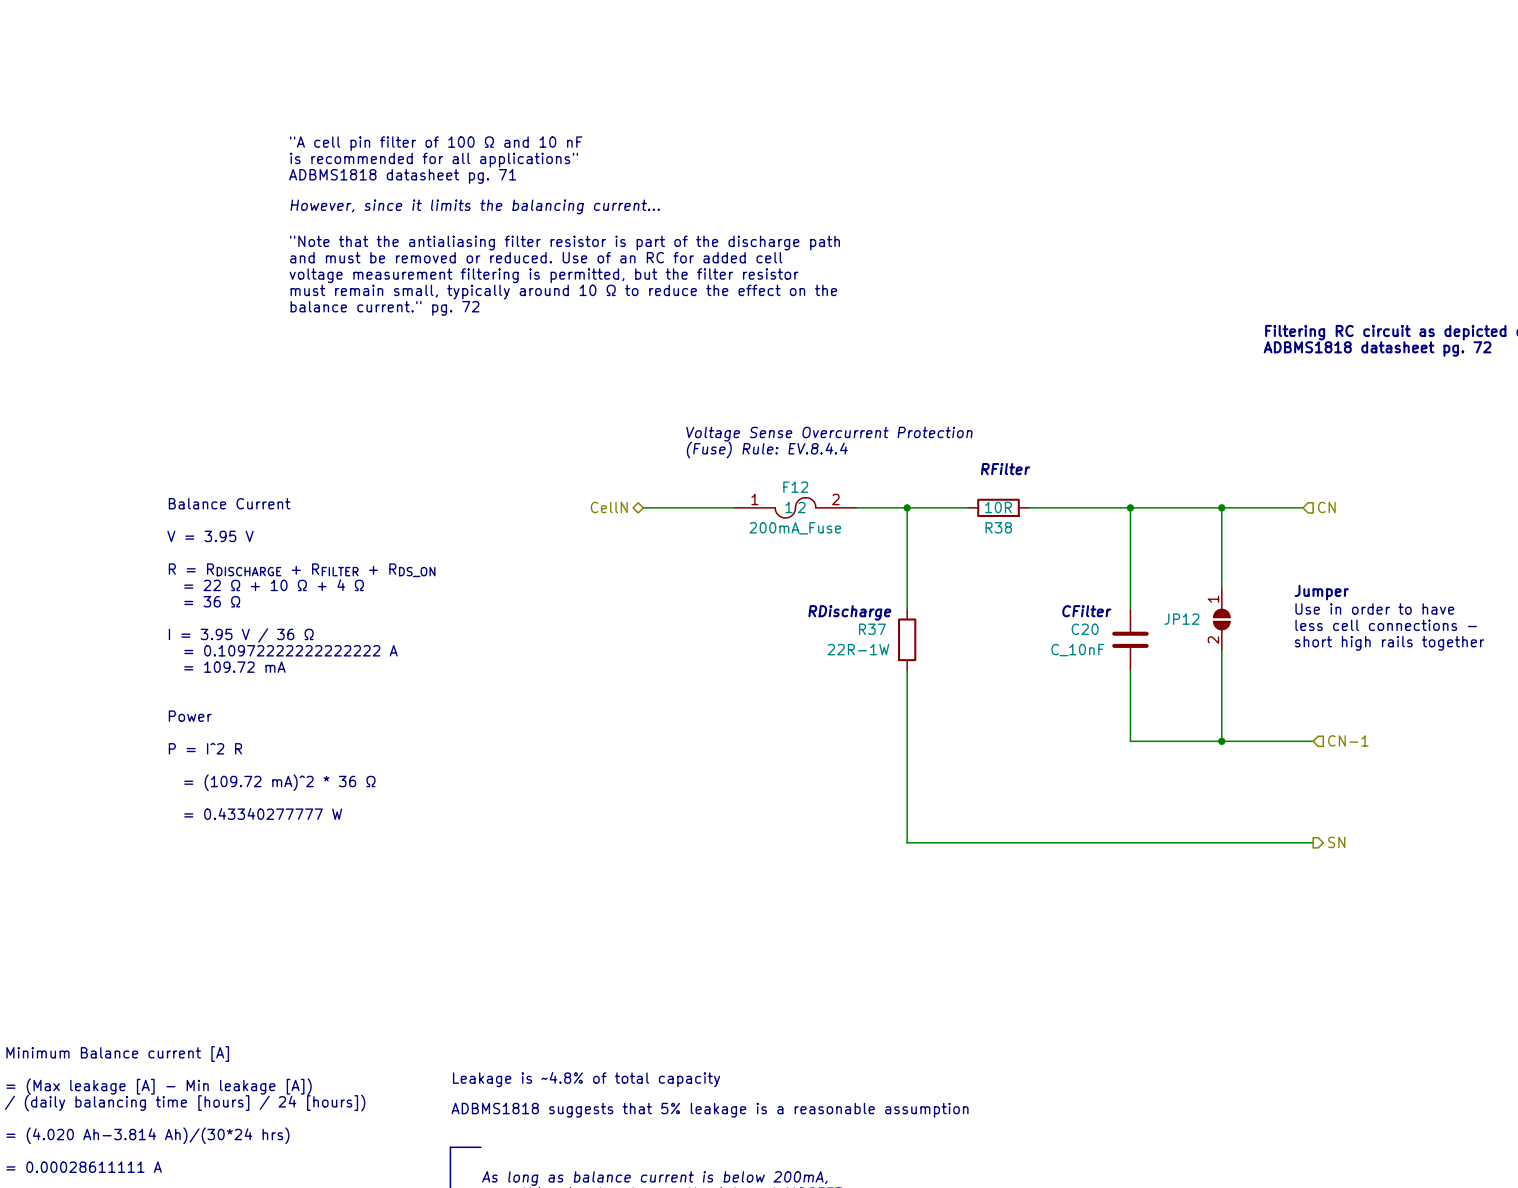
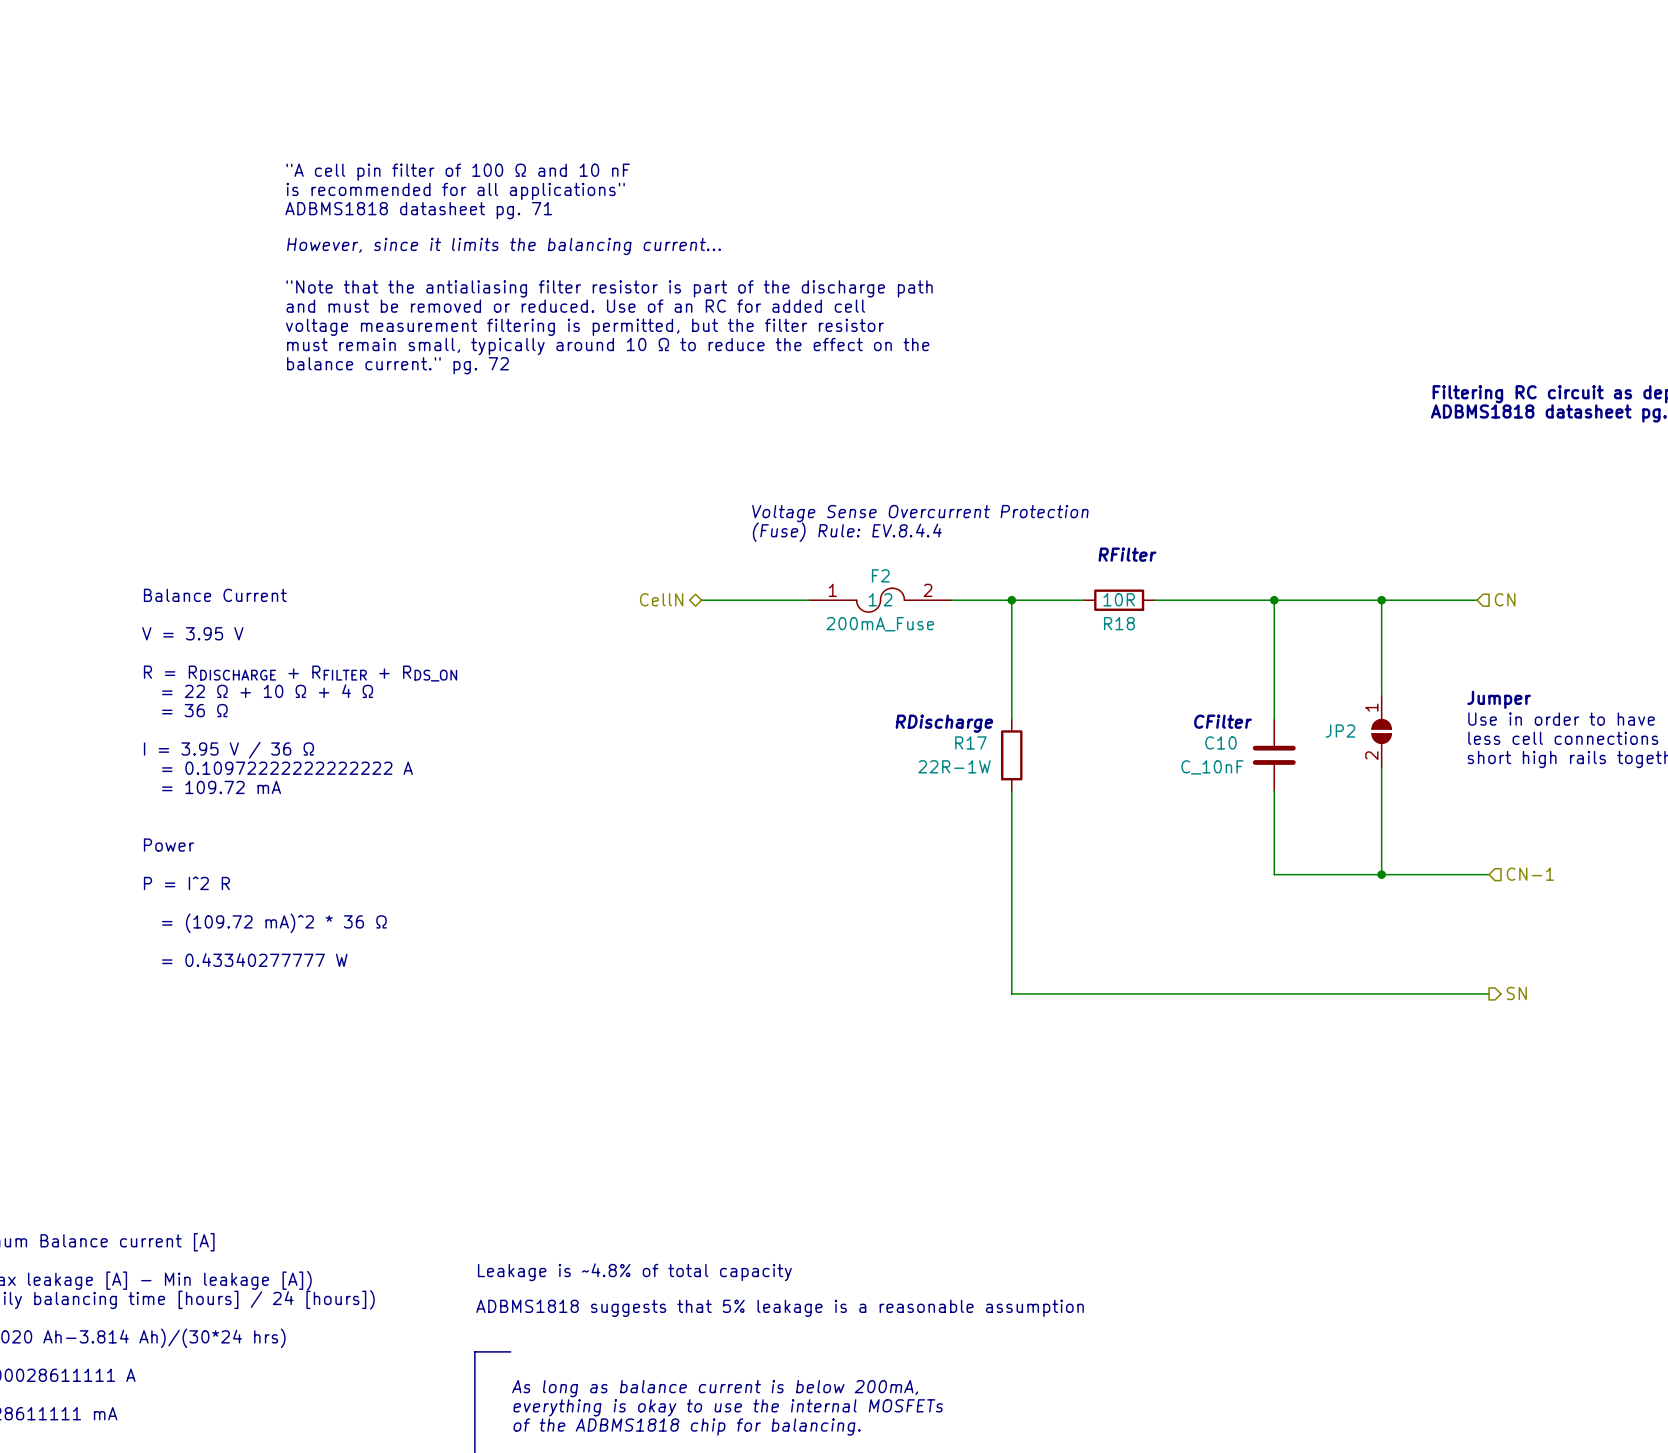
F12 name: F12 (795, 487) -> F2 (880, 575)
R38 name: R38 (998, 527) -> R18 (1119, 623)
JP12 name: JP12 (1181, 619) -> JP2 (1340, 731)
R37 name: R37 (872, 629) -> R17 (970, 742)
C20 name: C20 (1085, 629) -> C10 (1220, 742)

